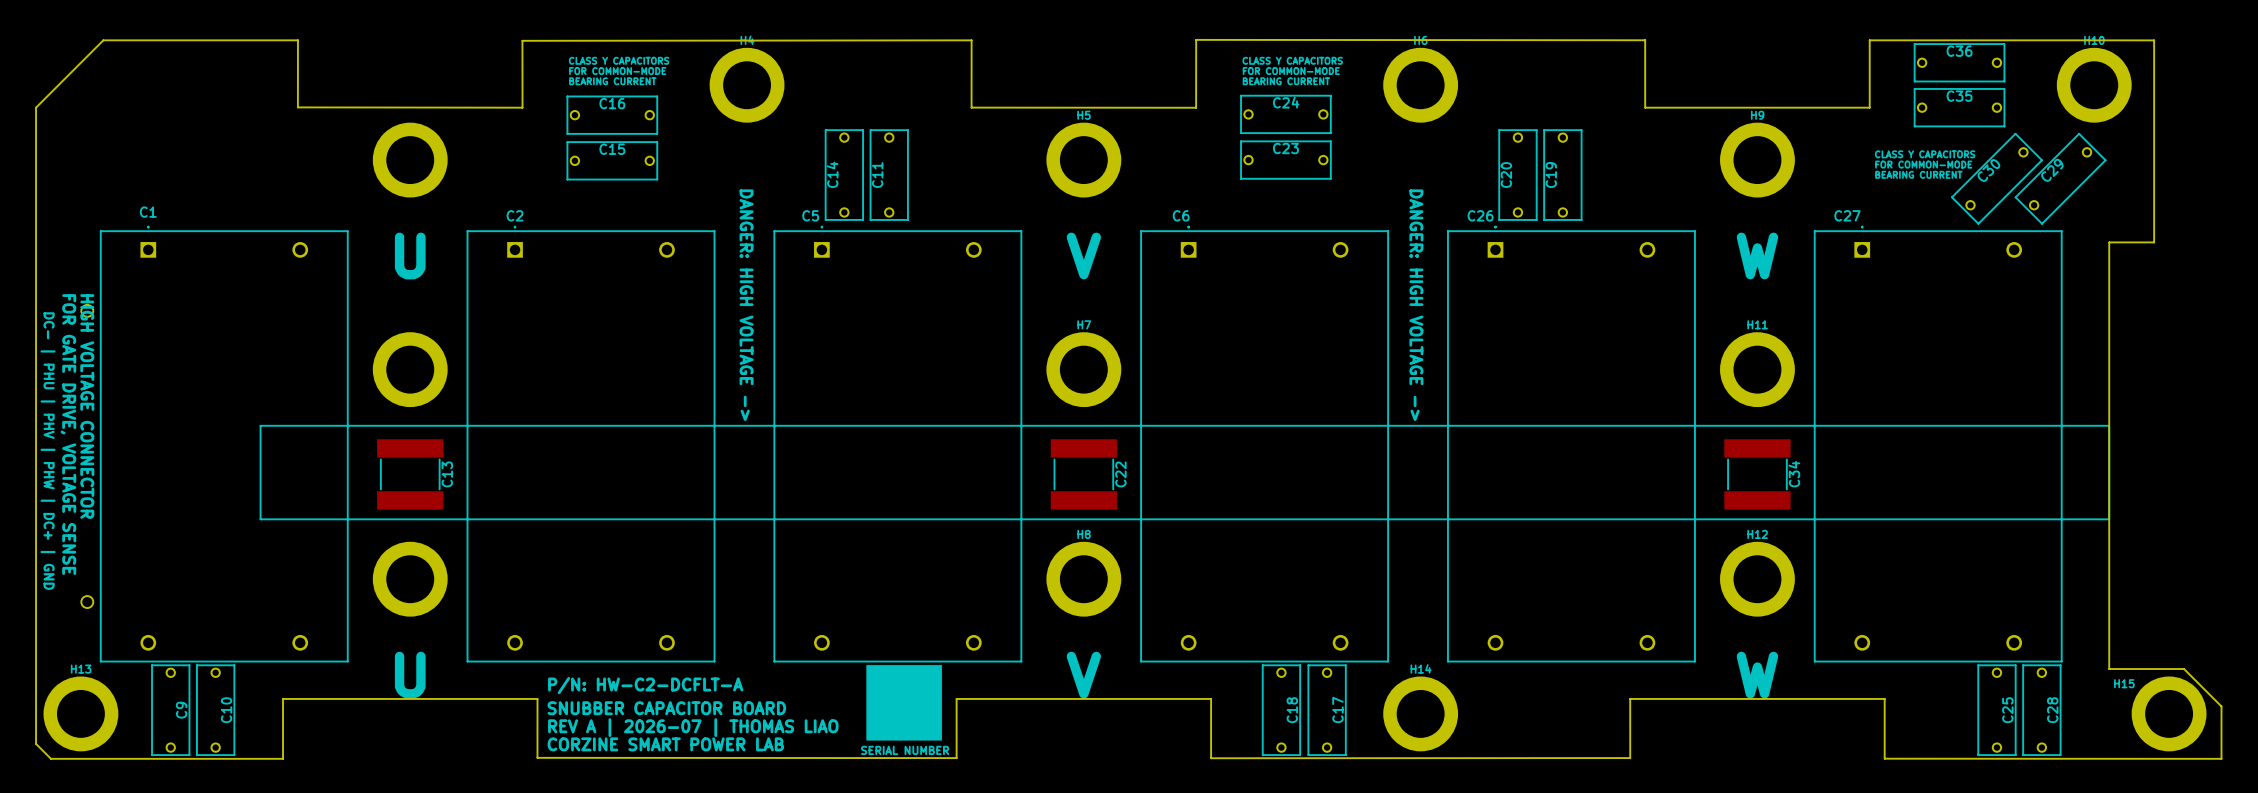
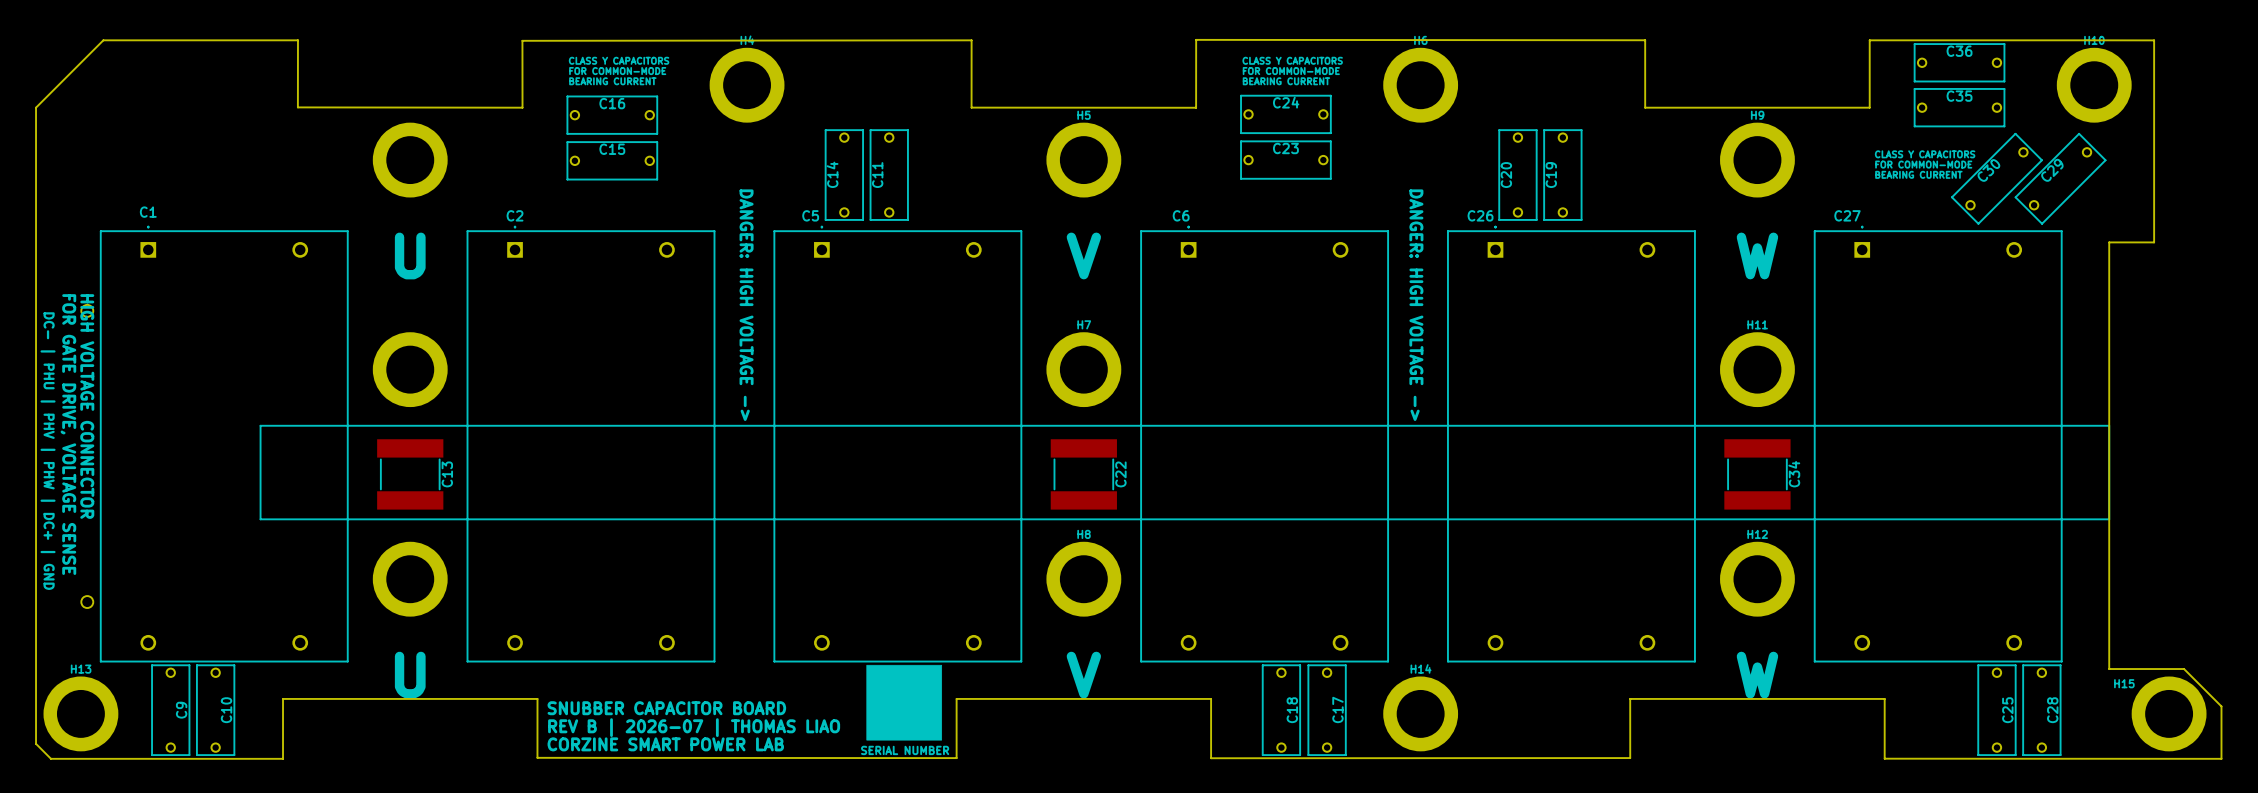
text: P/N: HW-C2-DCFLT-A (645, 685) -> none
text: REV A | 2026-07 | THOMAS LIAO (693, 727) -> REV B | 2026-07 | THOMAS LIAO (694, 727)

